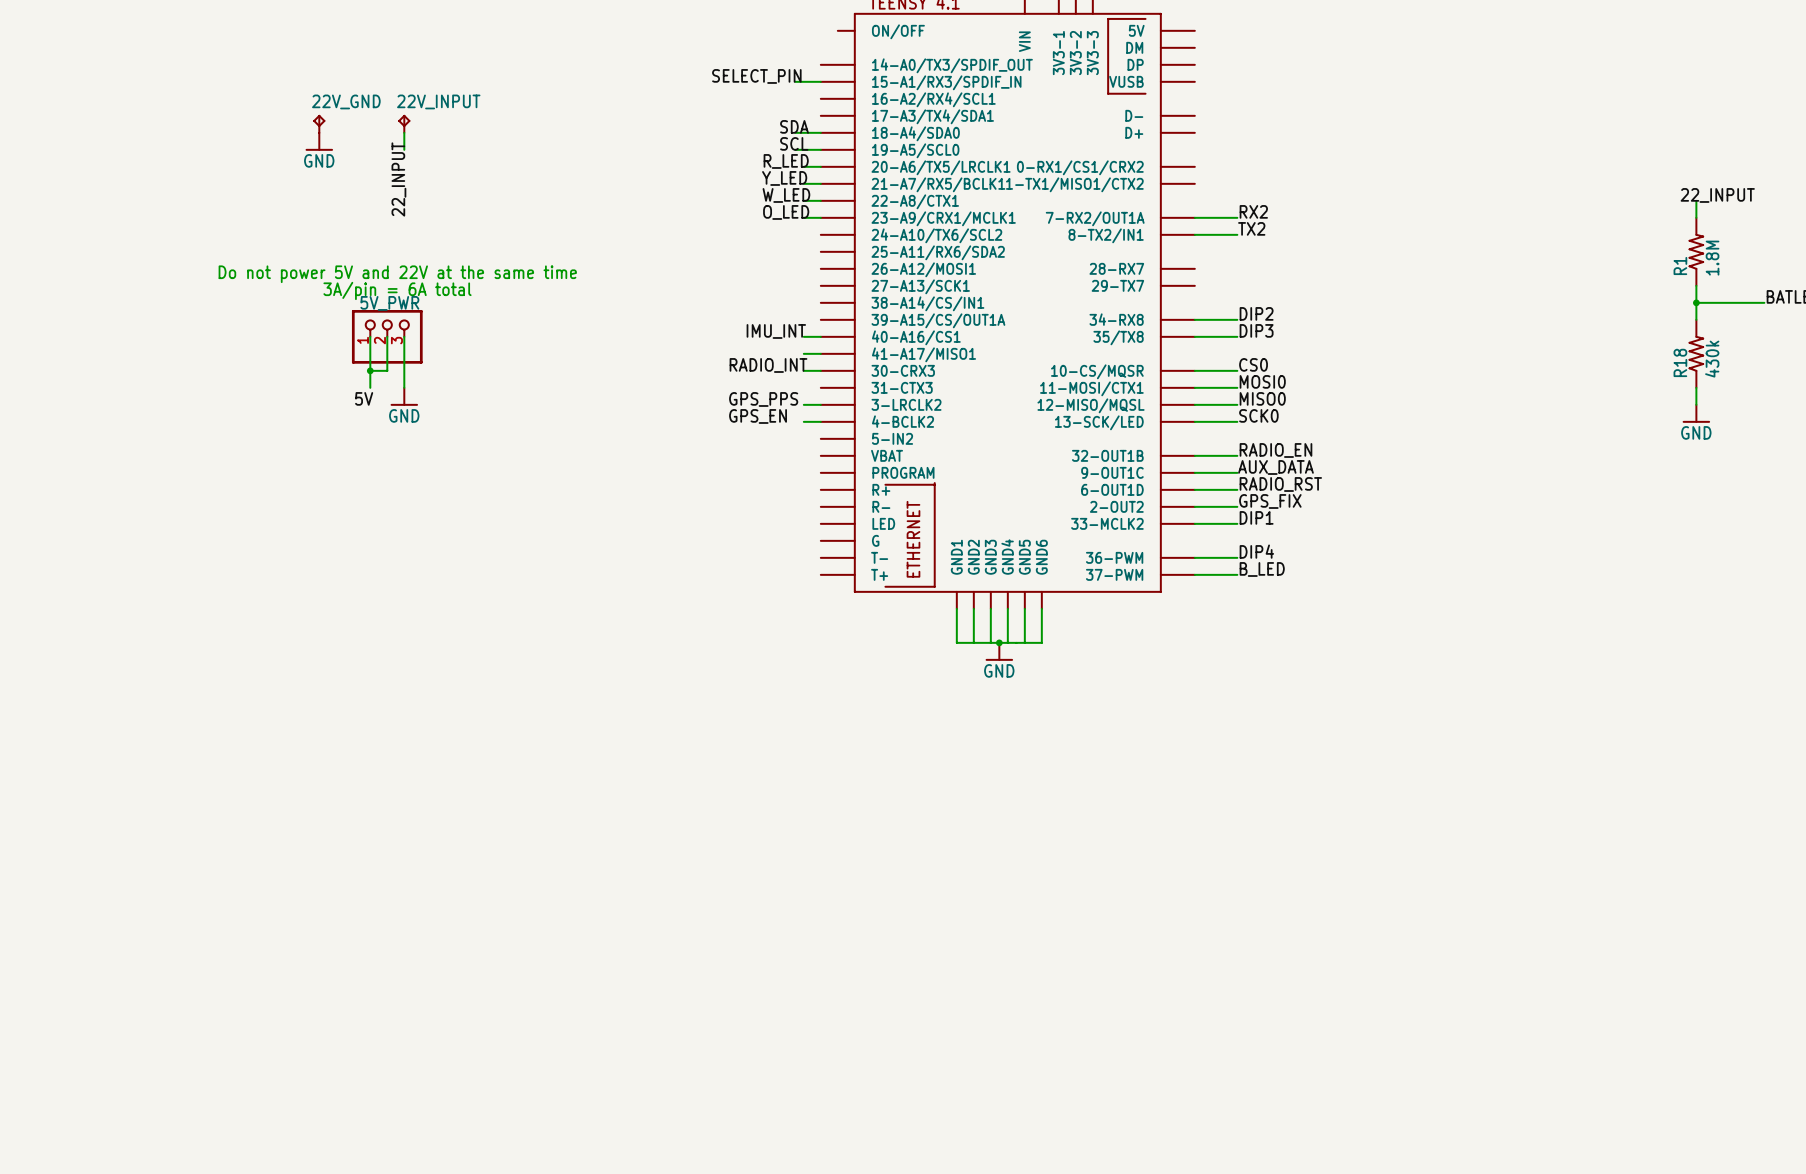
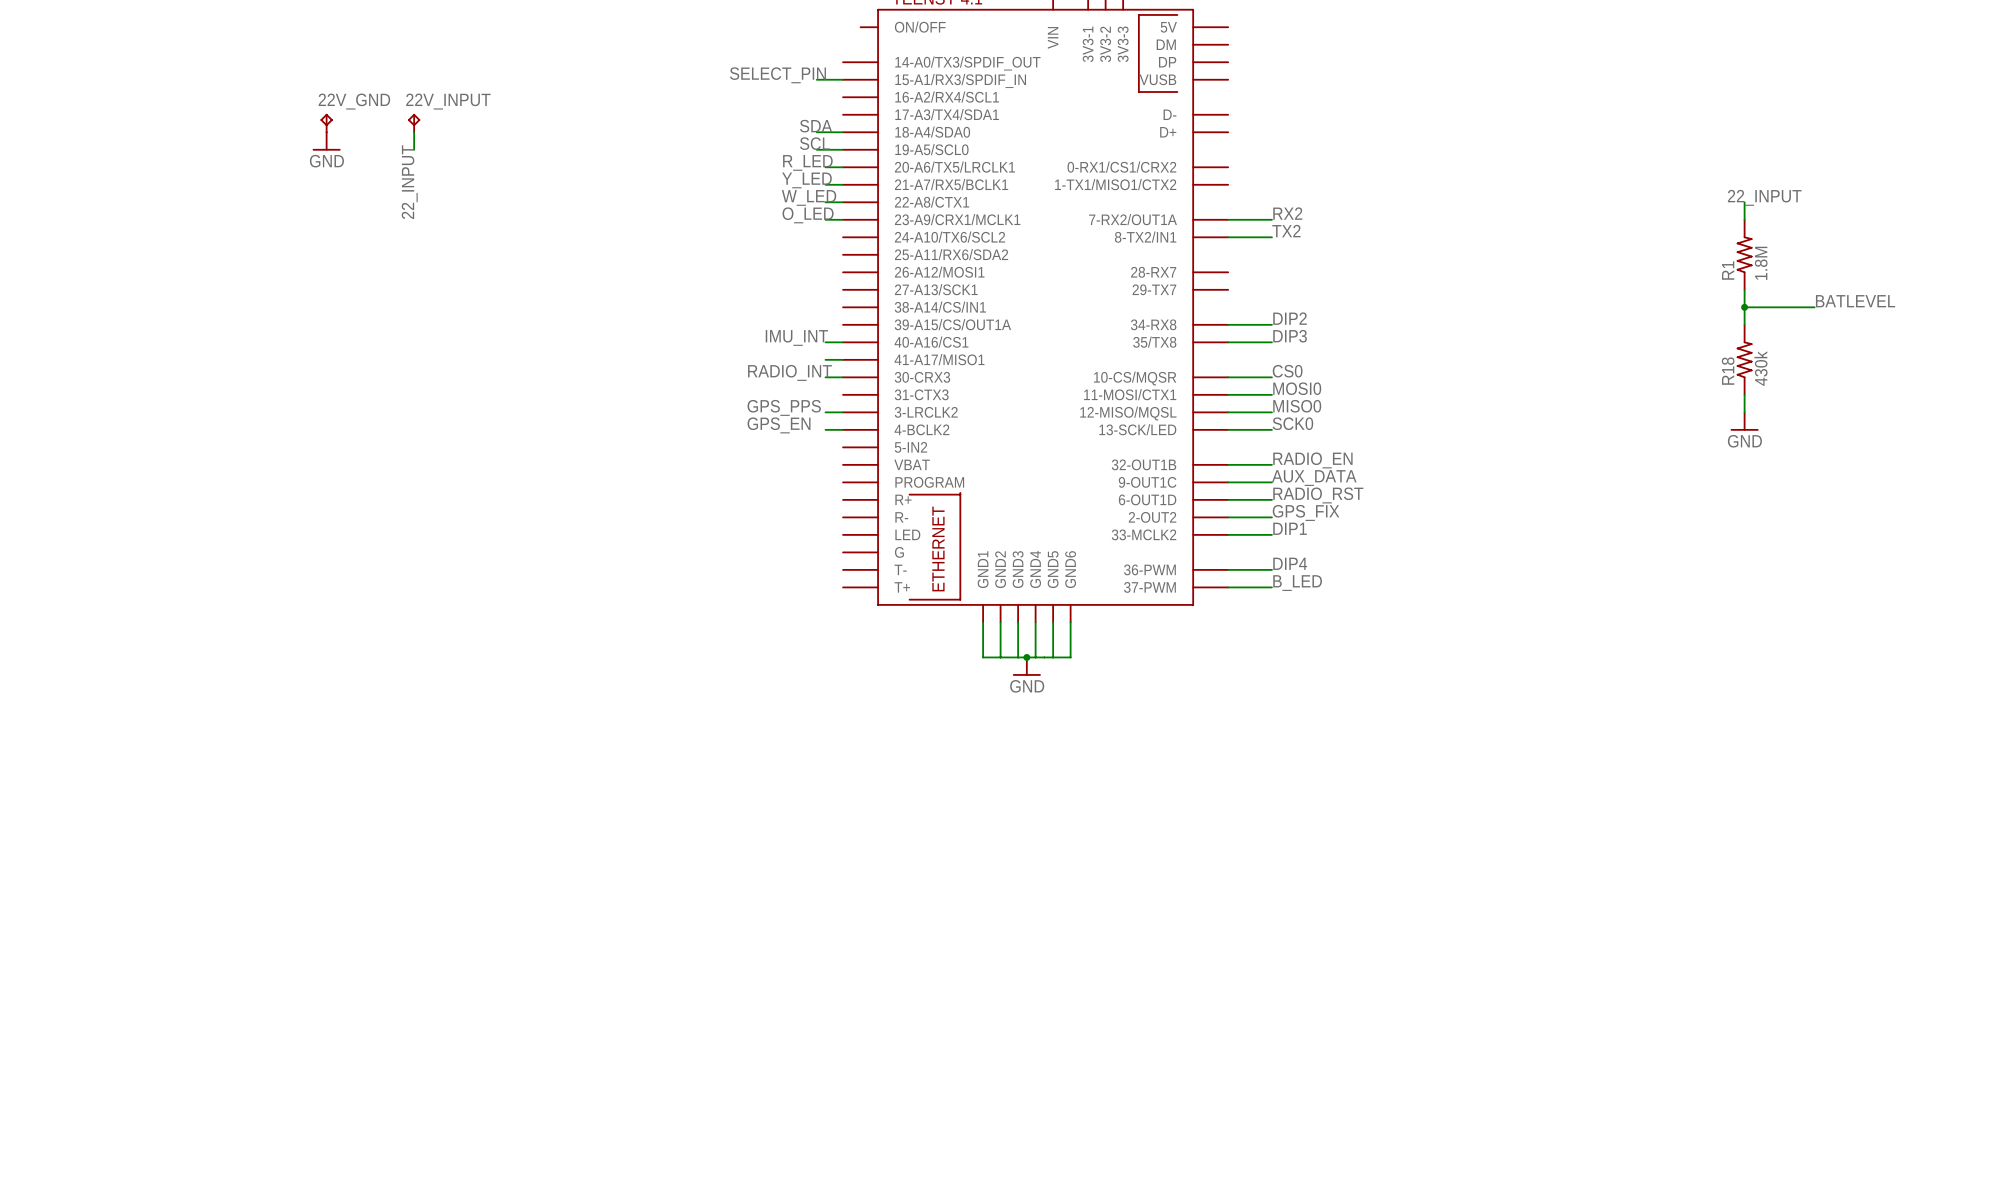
text: Do not power 5V and 22V at the same time (397, 274) -> none
text: 3A/pin = 6A total (397, 290) -> none
wire: (370, 336) (370, 387) -> none
wire: (387, 336) (387, 370) (370, 370) -> none
5V_PWR: (387, 336) -> none
wire: (404, 336) (404, 387) -> none
junction: (370, 370) -> none
power symbol: GND (404, 396) -> none
label: 5V (364, 398) -> none

